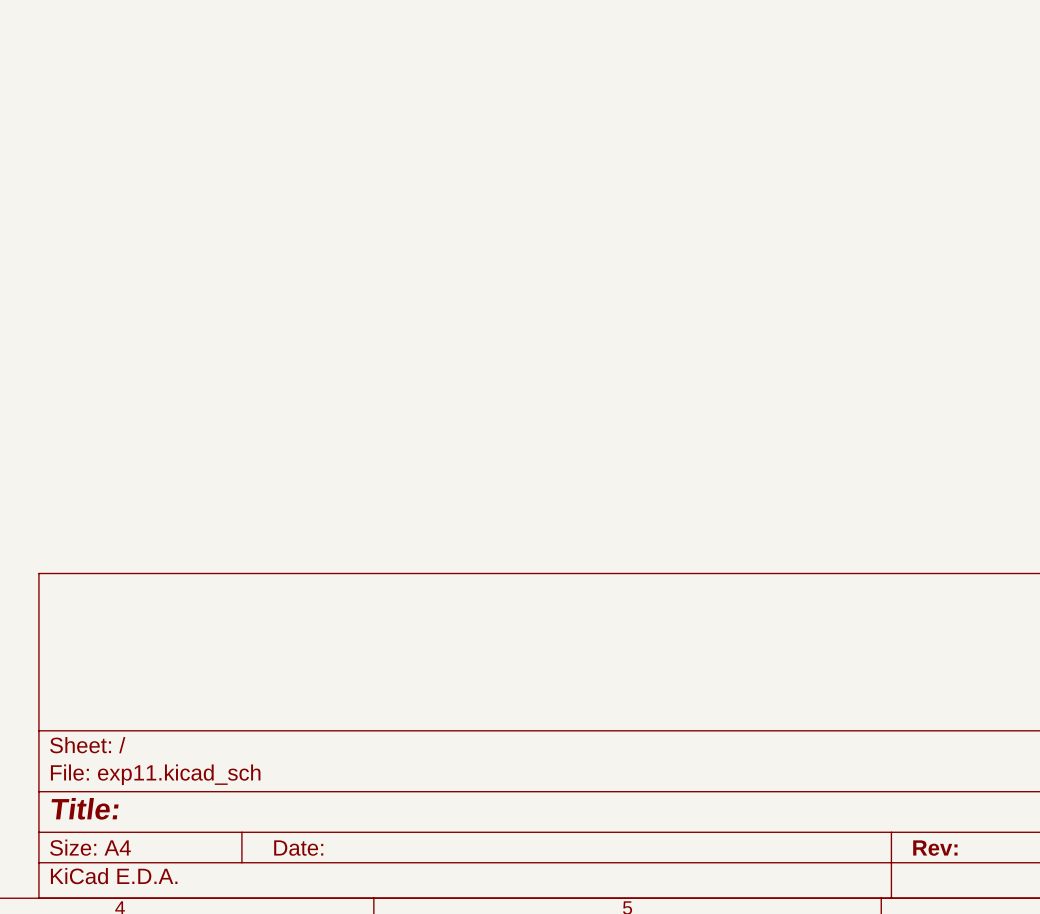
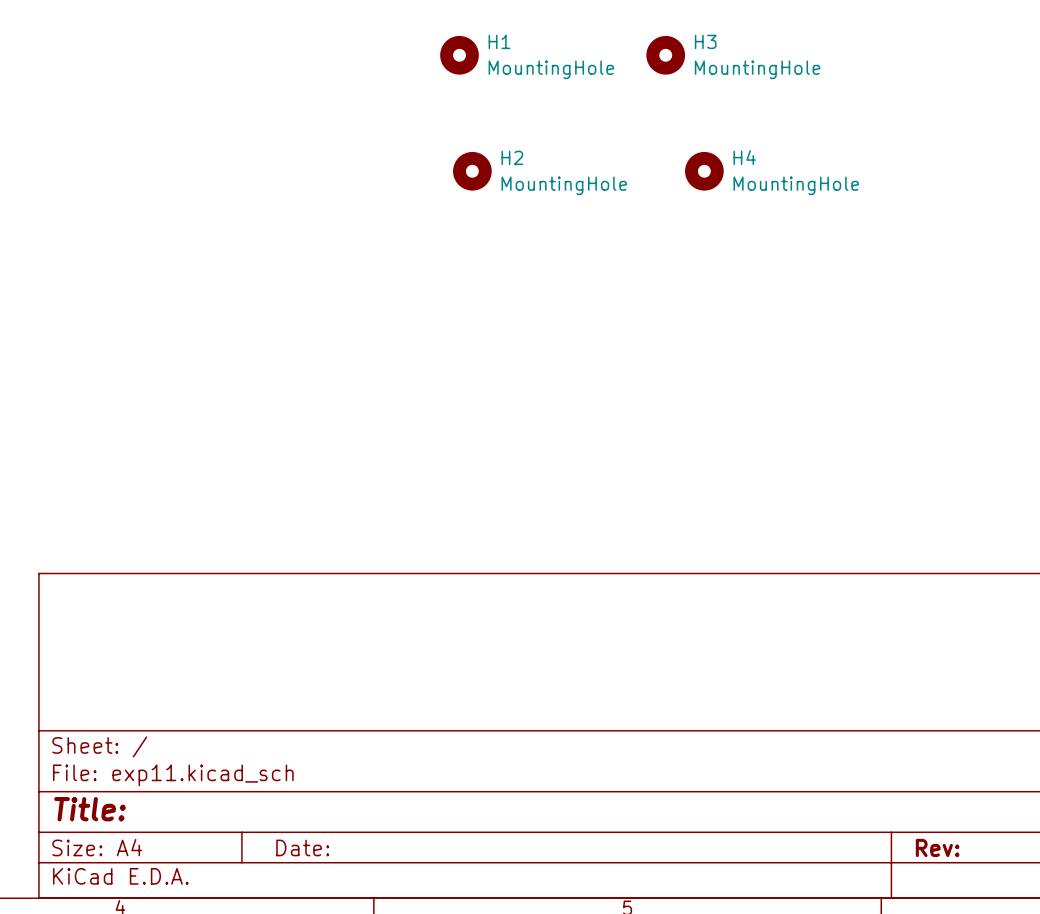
H1: none -> MountingHole (459, 55)
H3: none -> MountingHole (665, 55)
H2: none -> MountingHole (472, 171)
H4: none -> MountingHole (704, 171)

